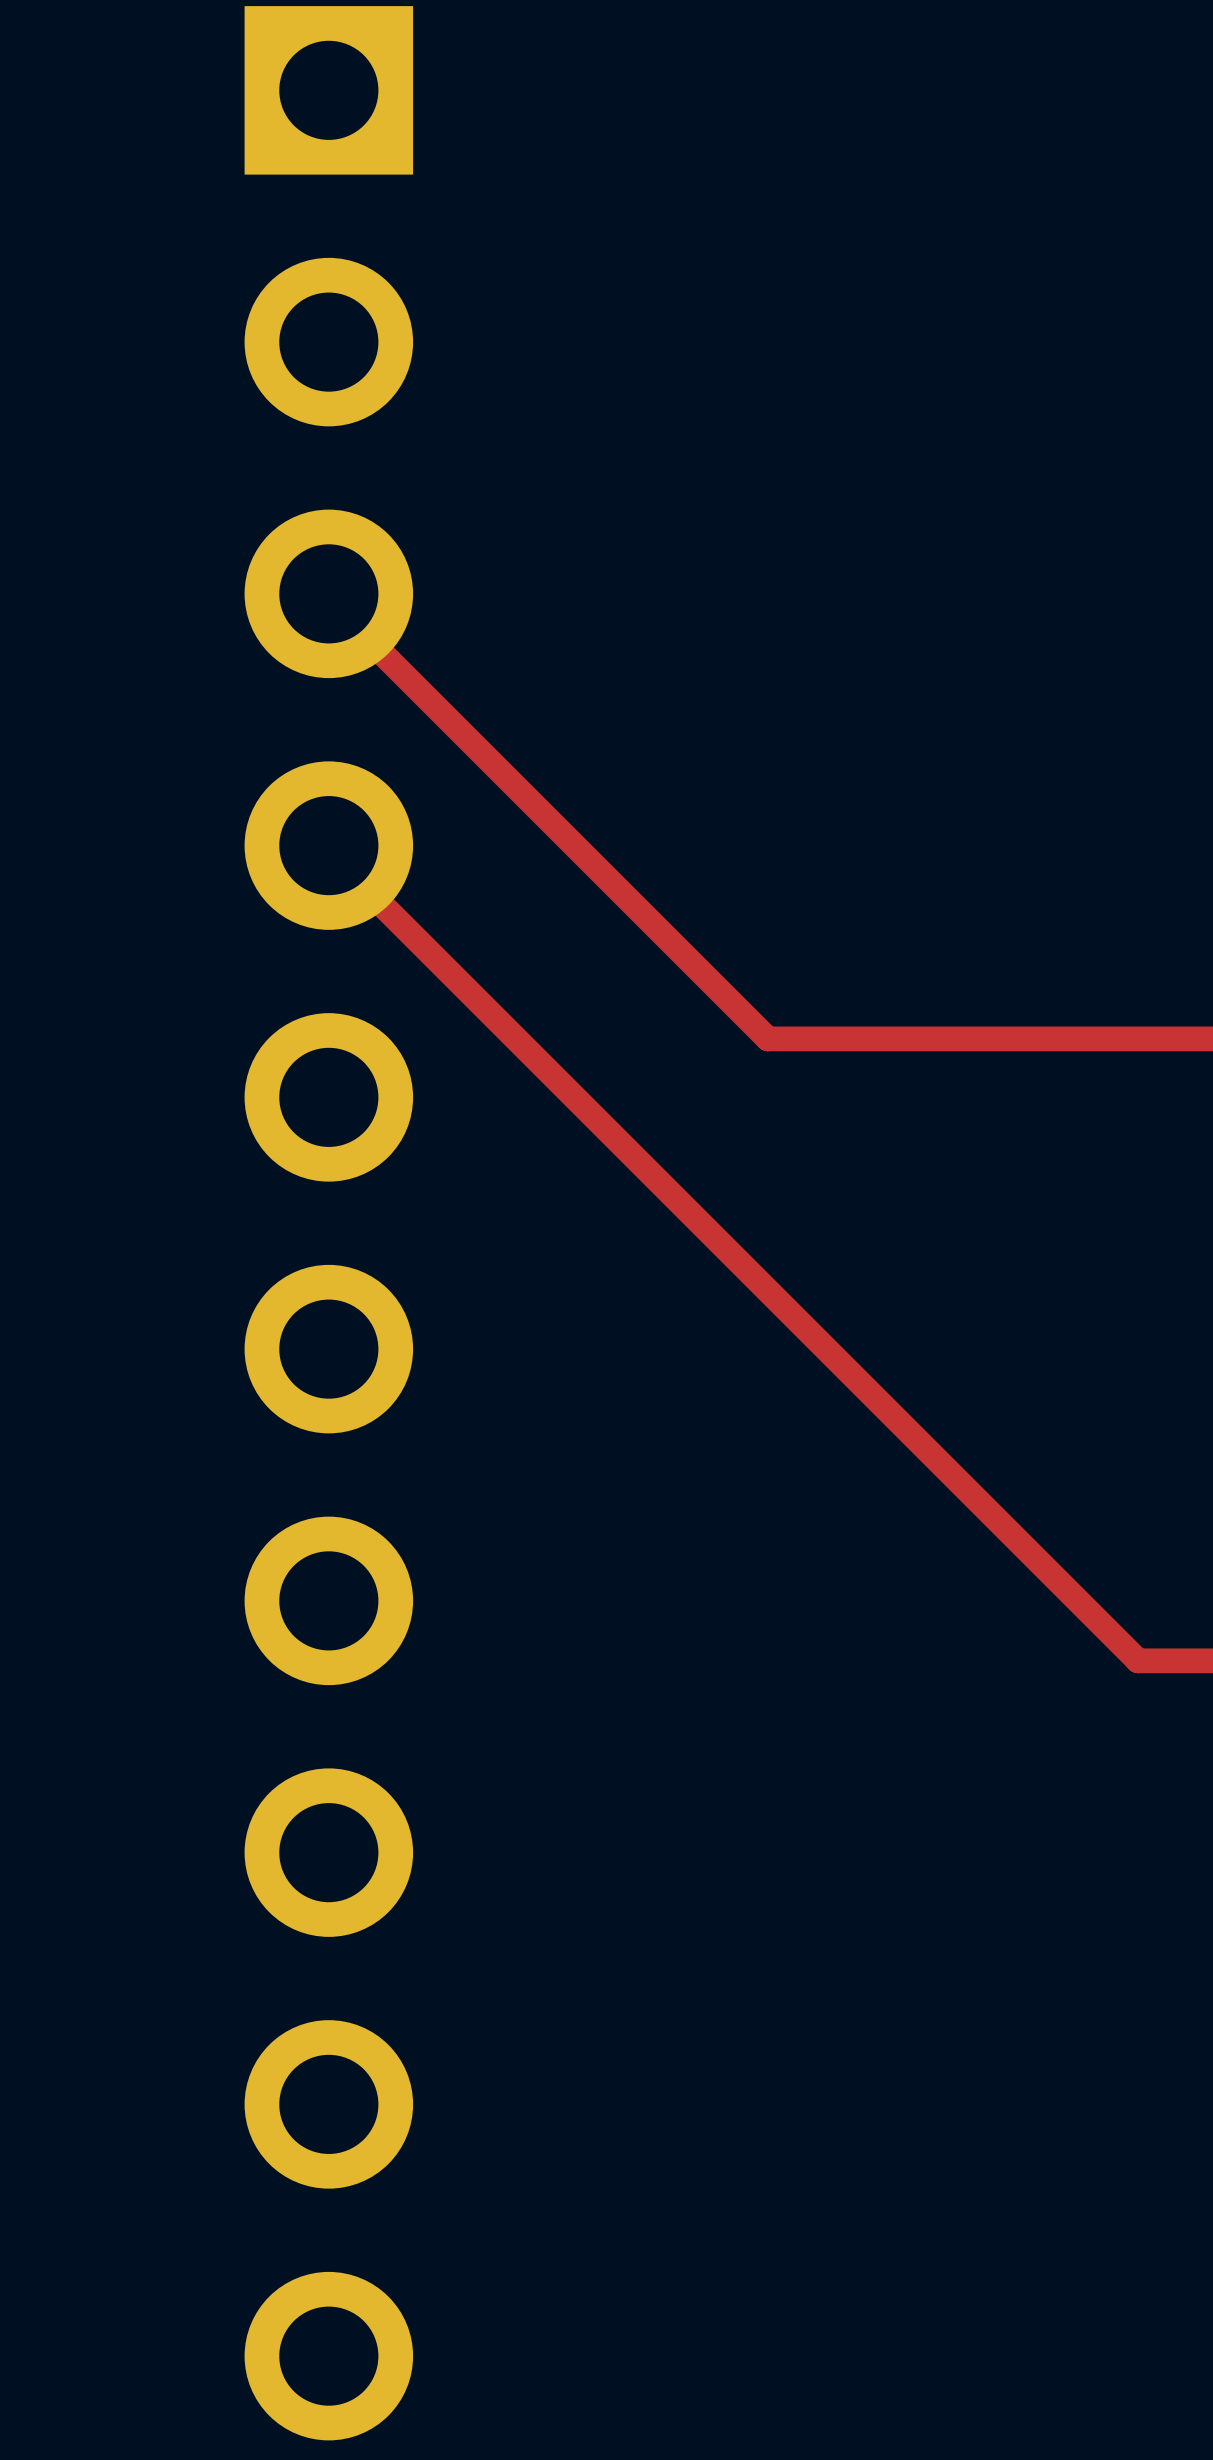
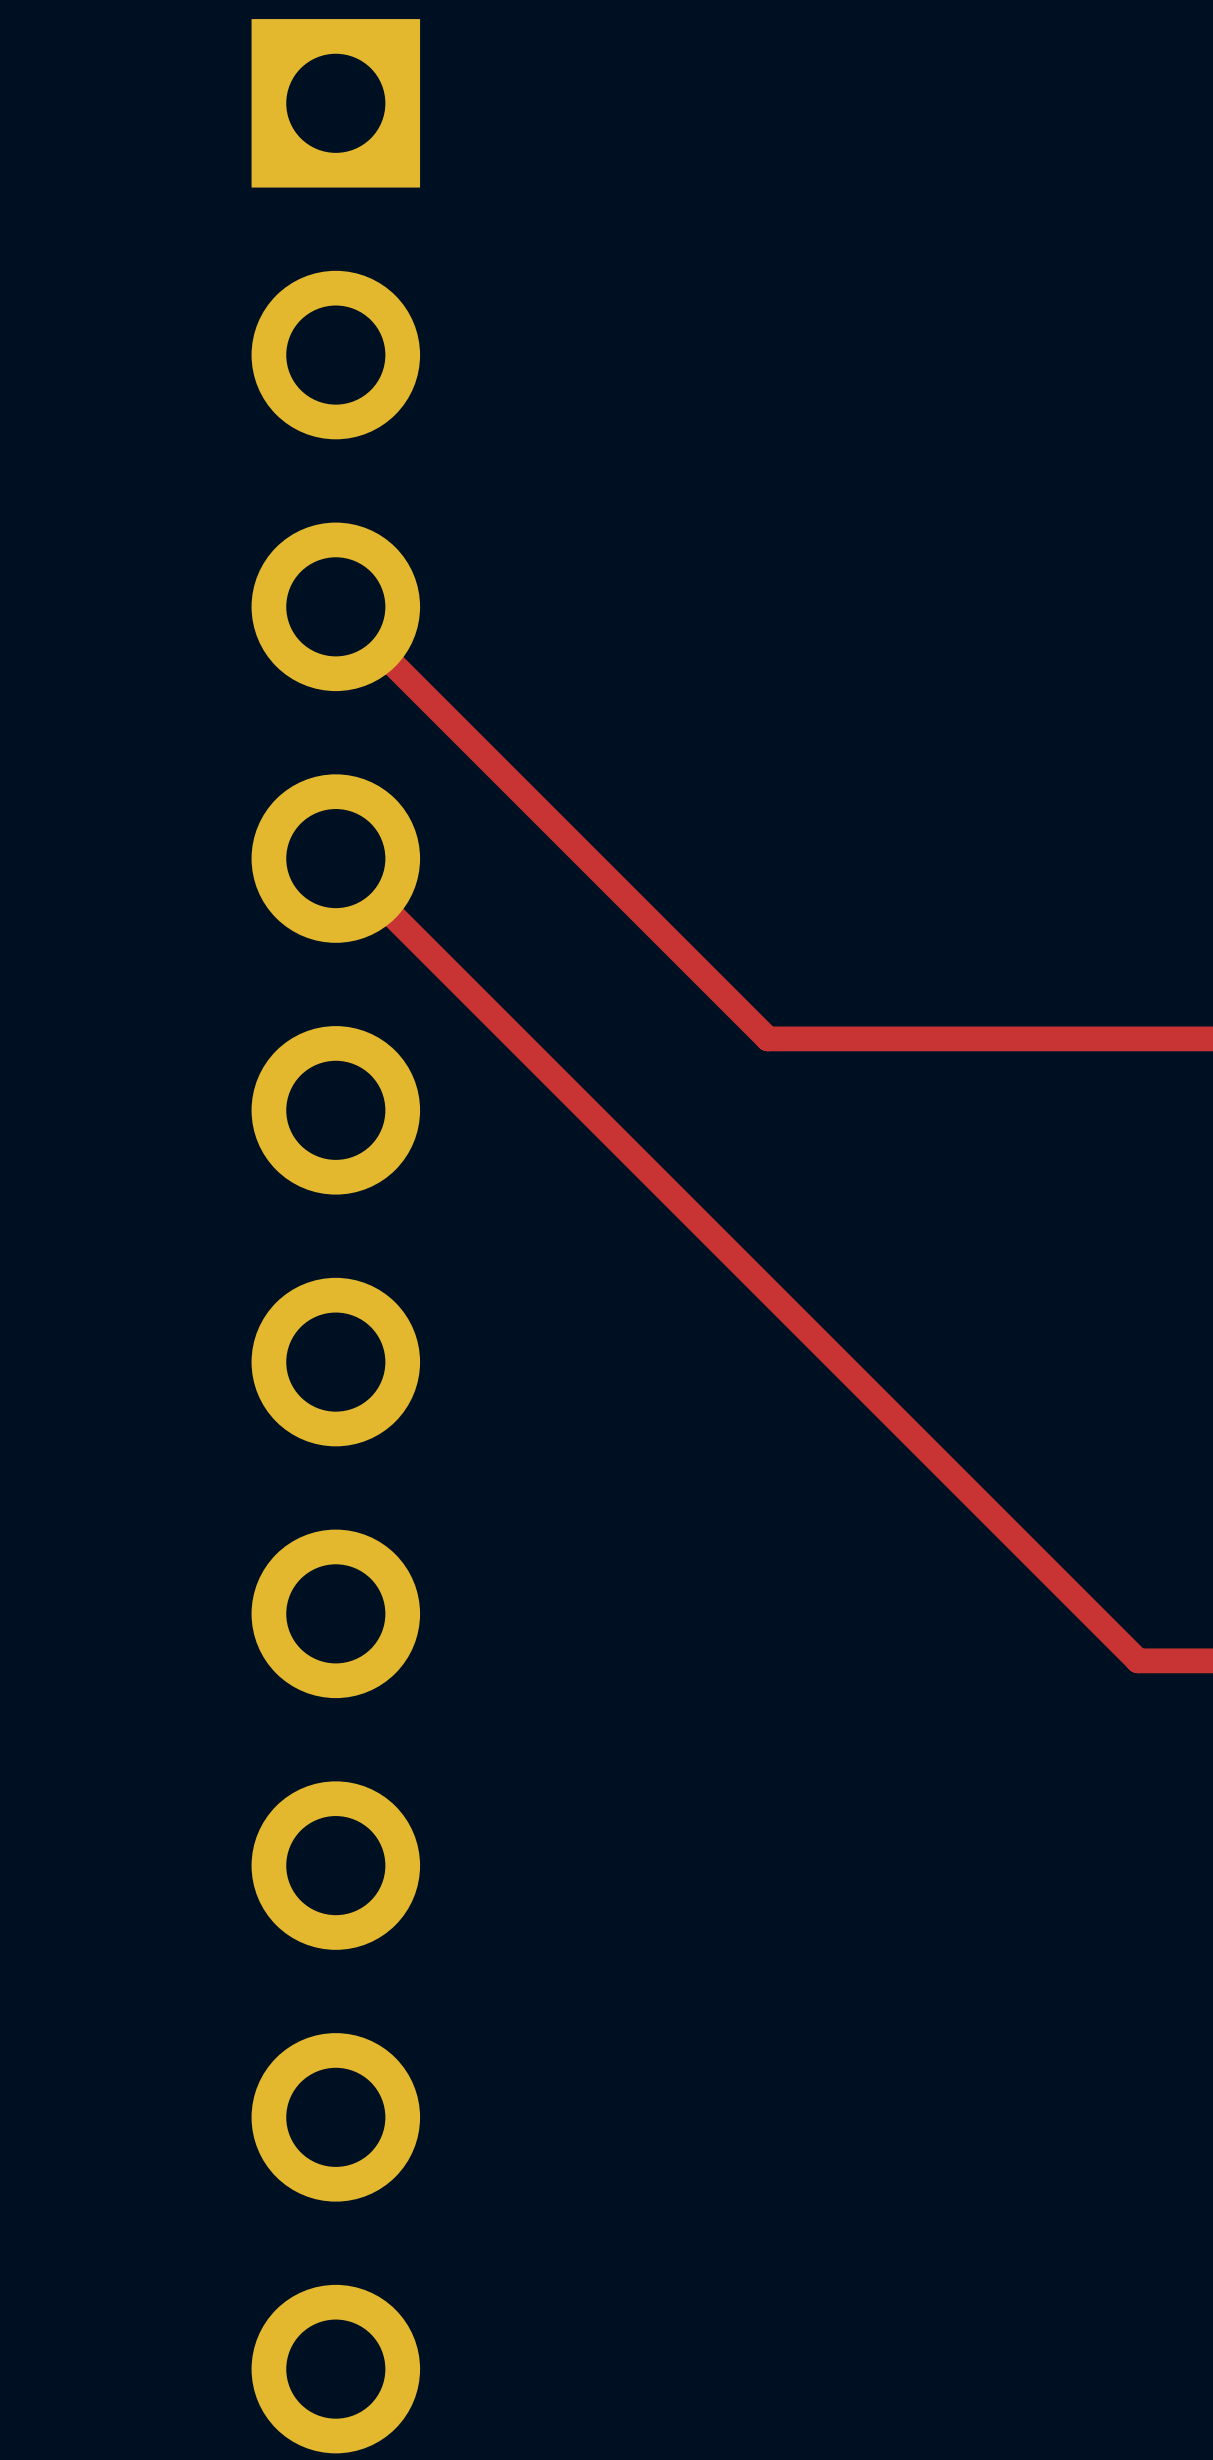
part position: (328, 1223) -> (335, 1236)

